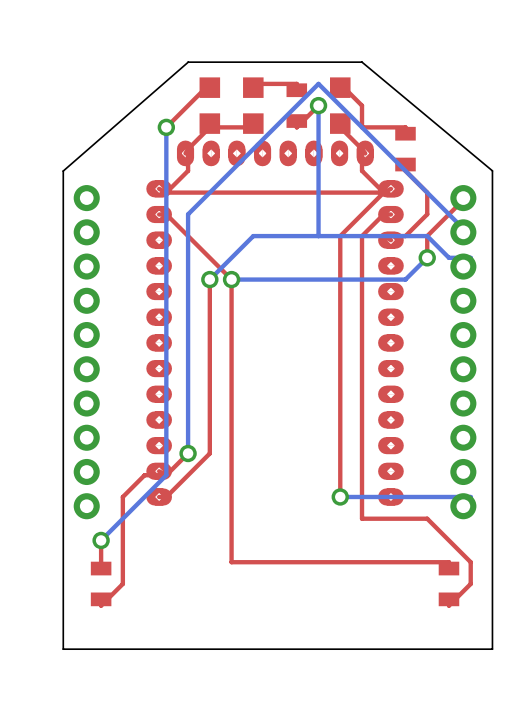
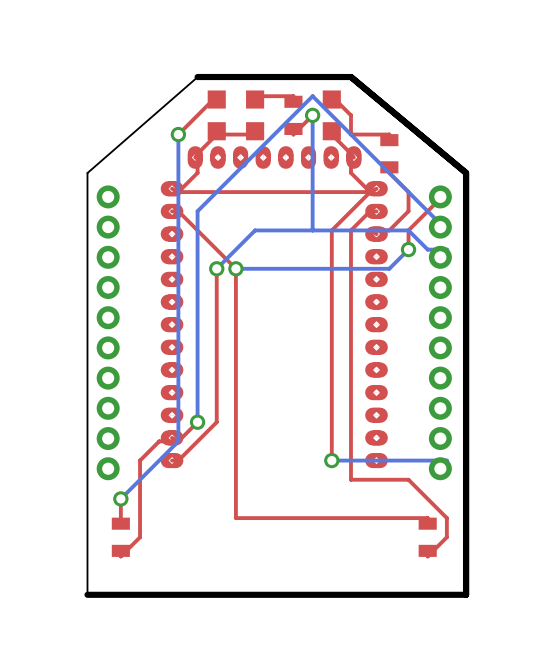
board edge width: thin (188, 62) (362, 62) (492, 170) -> thick (197, 77) (350, 77) (466, 172)
board edge width: thin (492, 171) (492, 649) (63, 649) -> thick (466, 173) (466, 594) (87, 594)

